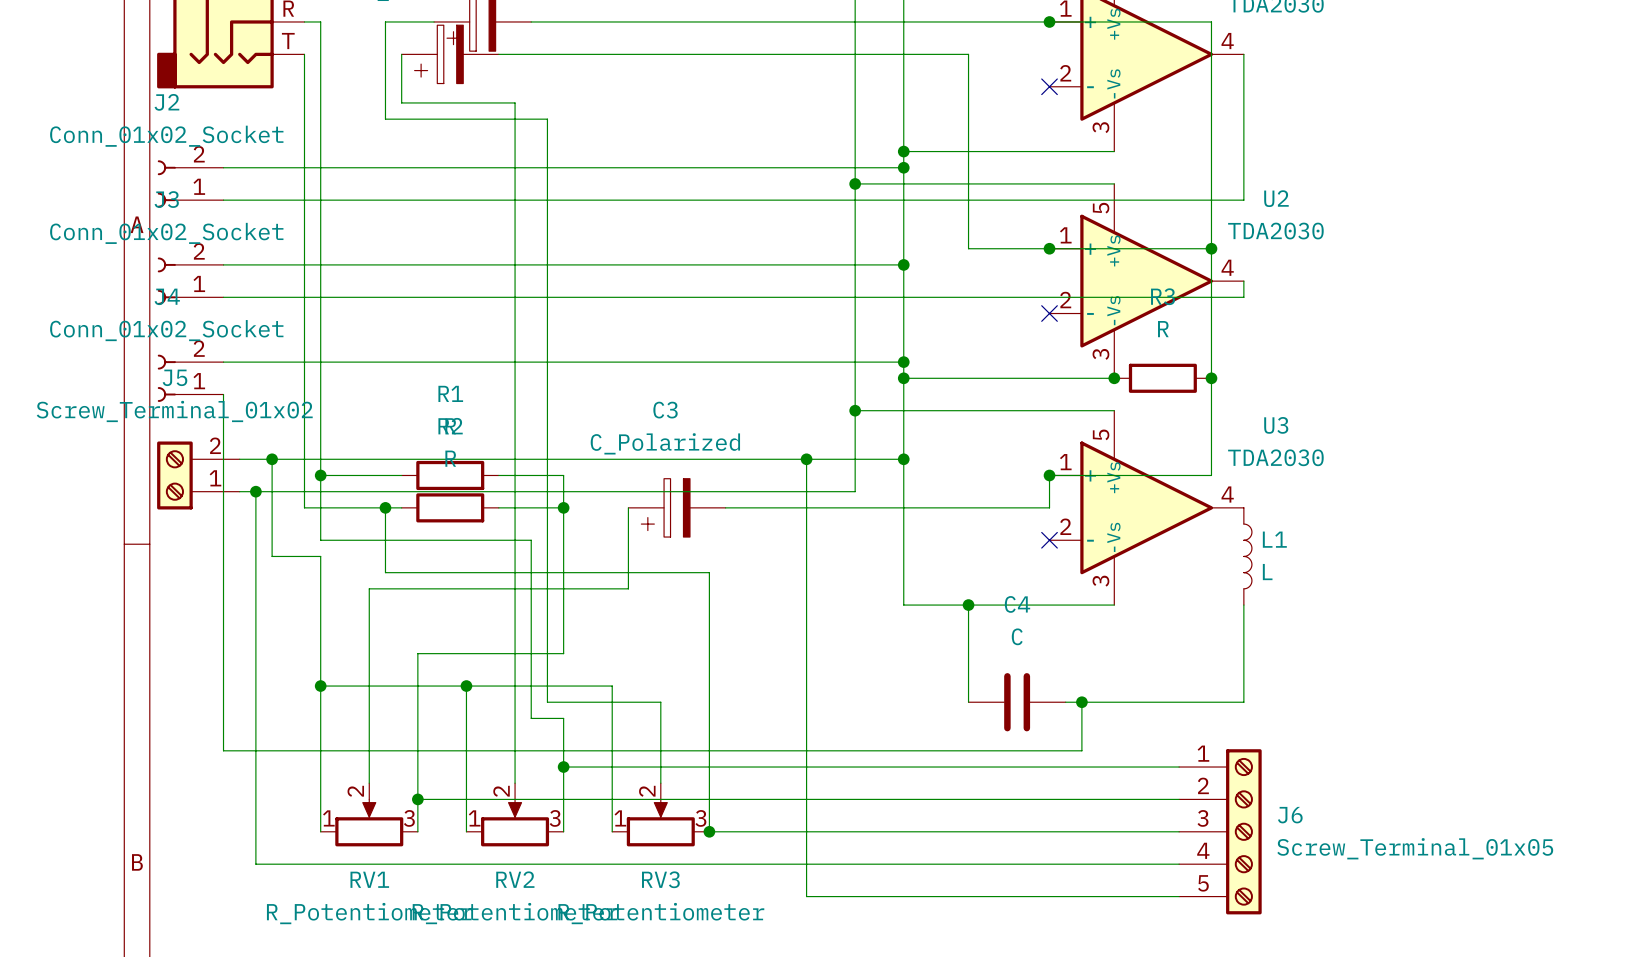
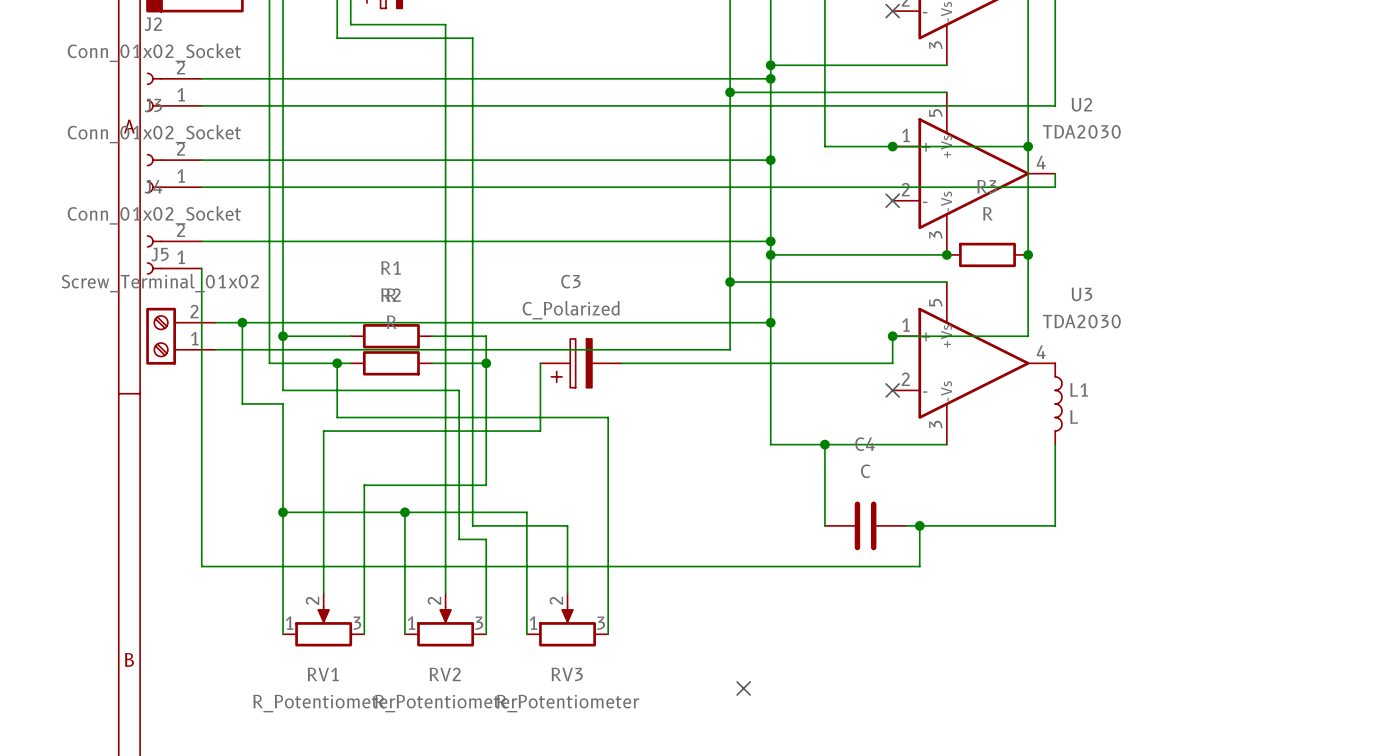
wire: (806, 459) (806, 896) (1179, 896) -> none
junction: (806, 459) -> none
wire: (255, 491) (255, 864) (1179, 864) -> none
junction: (255, 491) -> none
wire: (563, 767) (1179, 767) -> none
junction: (563, 767) -> none
wire: (417, 799) (1179, 799) -> none
junction: (417, 799) -> none
wire: (709, 831) (1179, 831) -> none
junction: (709, 831) -> none
J6: Screw_Terminal_01x05 (1220, 831) -> none
no-connect mark: none -> (743, 688)

